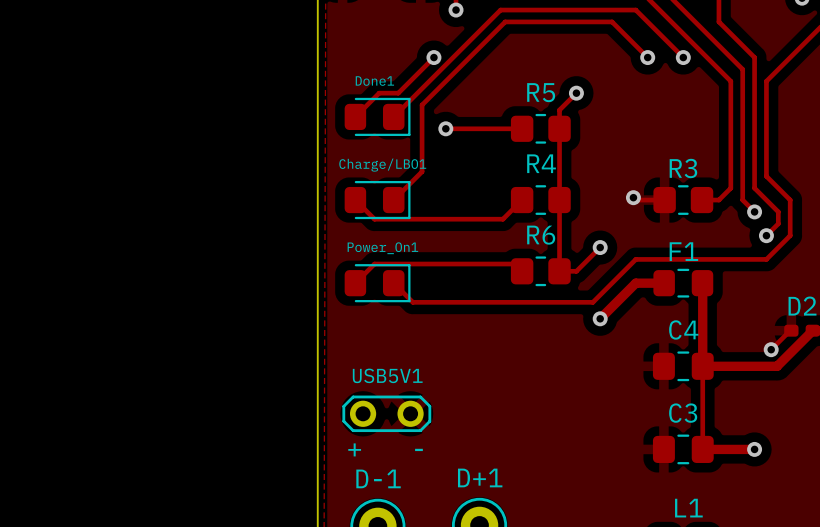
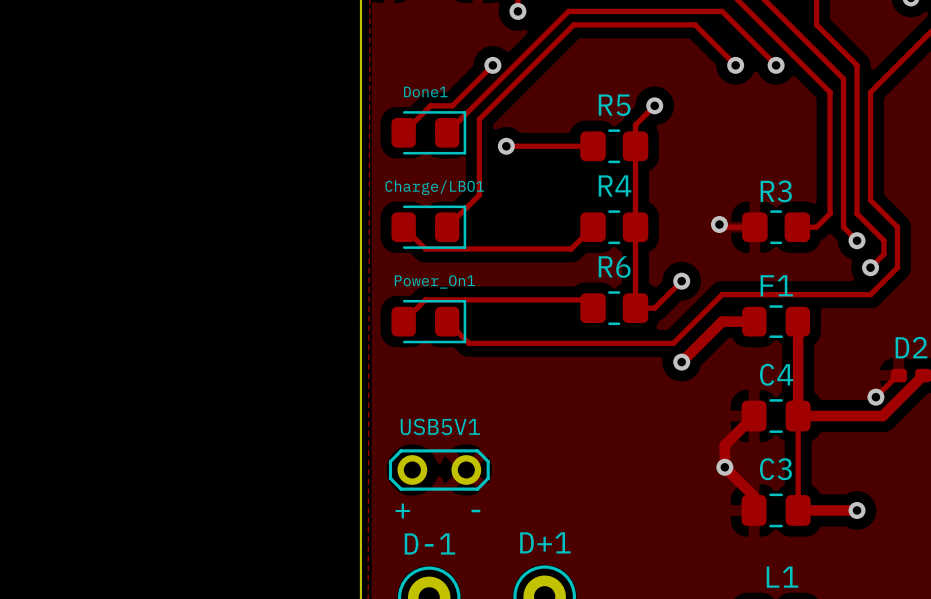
track: none -> (754, 416) (724, 445) (724, 467) (754, 496) (754, 510)
via: none -> (724, 467)

